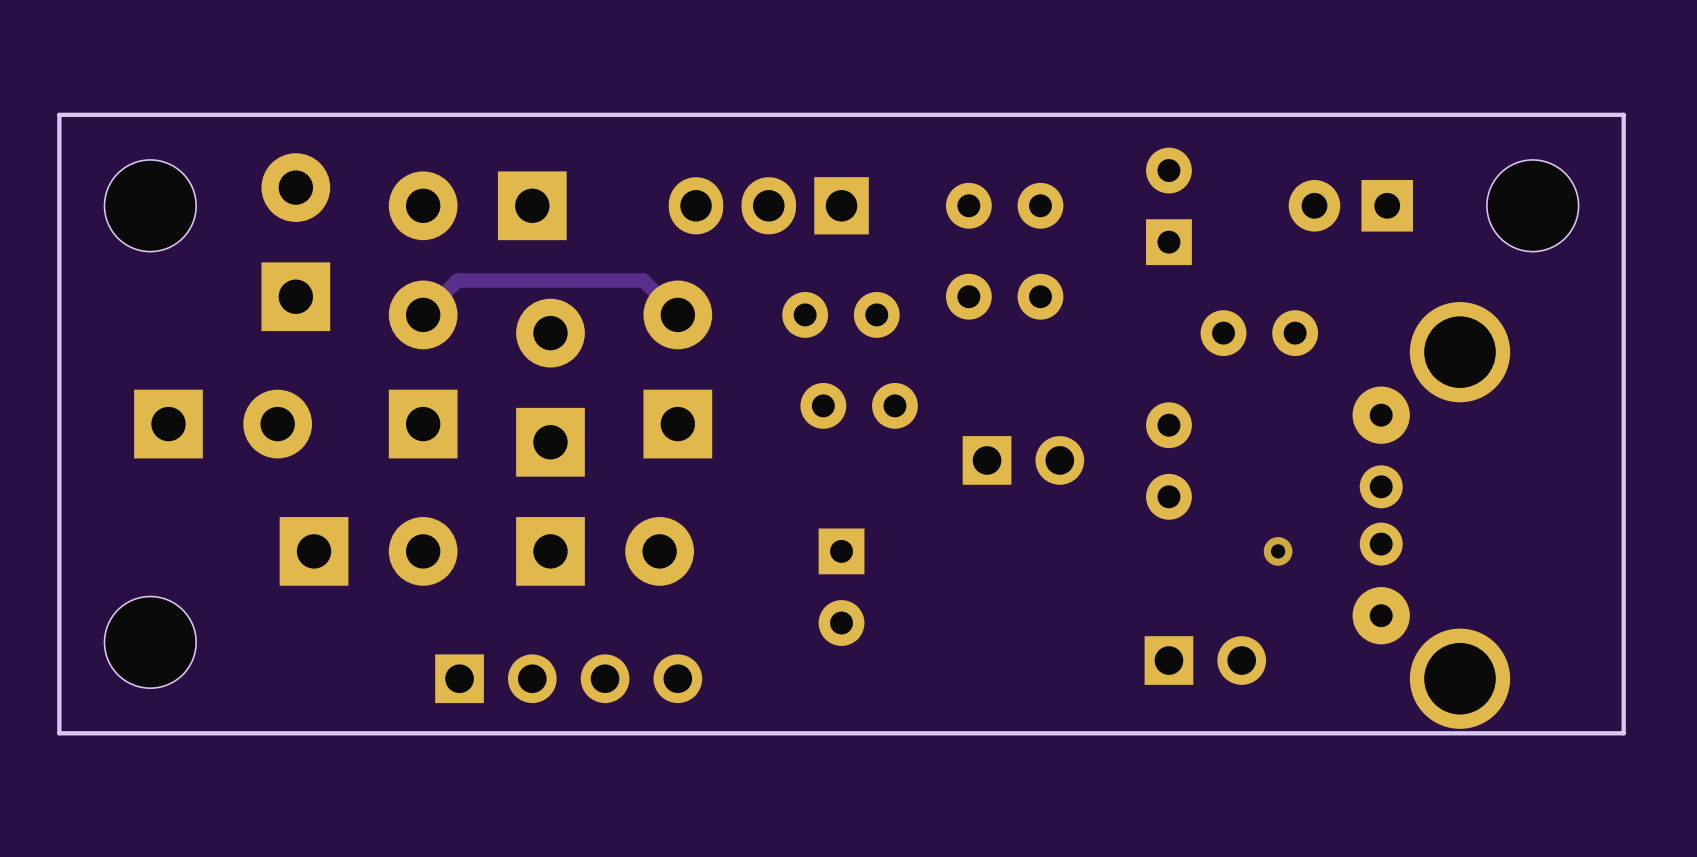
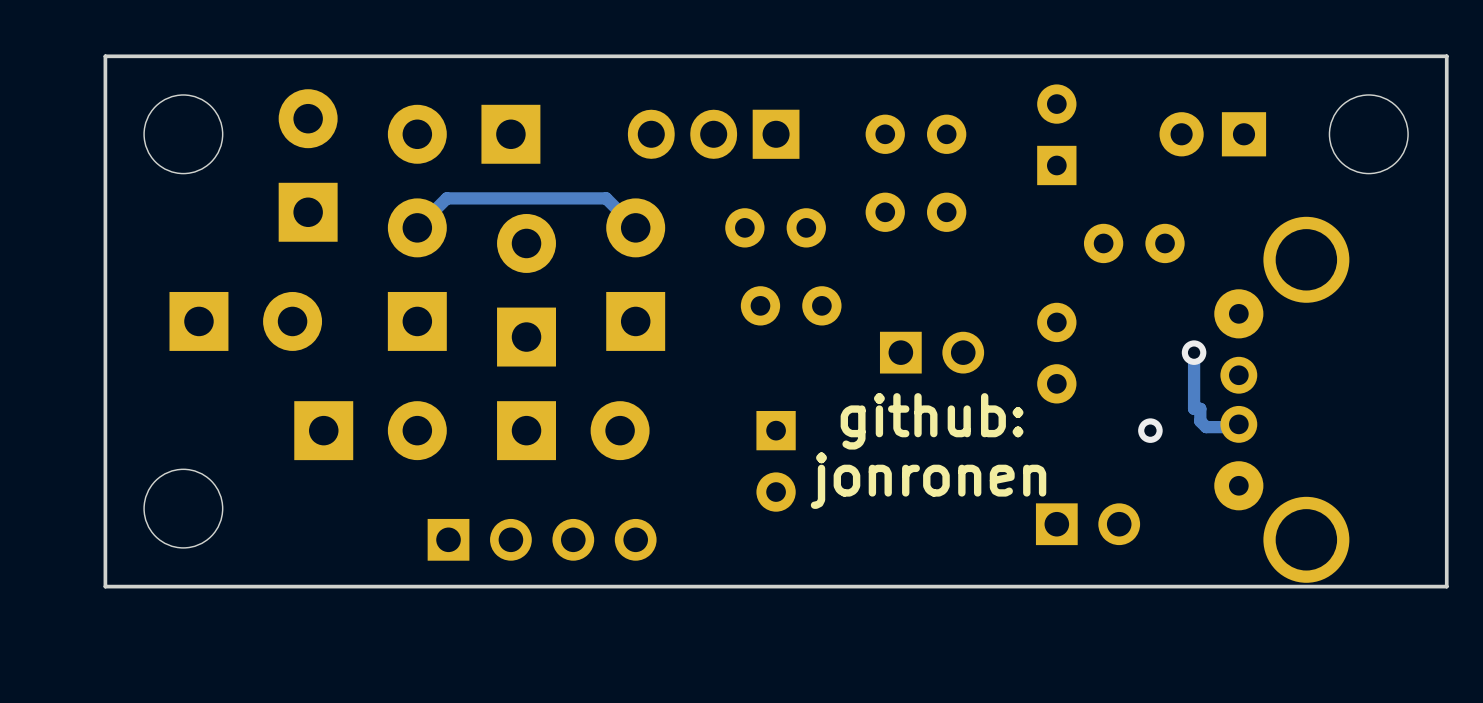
track: none -> (1194, 352) (1194, 408) (1200, 408) (1200, 421) (1206, 427) (1237, 427)
via: none -> (1194, 352)
text: none -> github: (932, 421)
text: none -> jonronen (928, 480)

